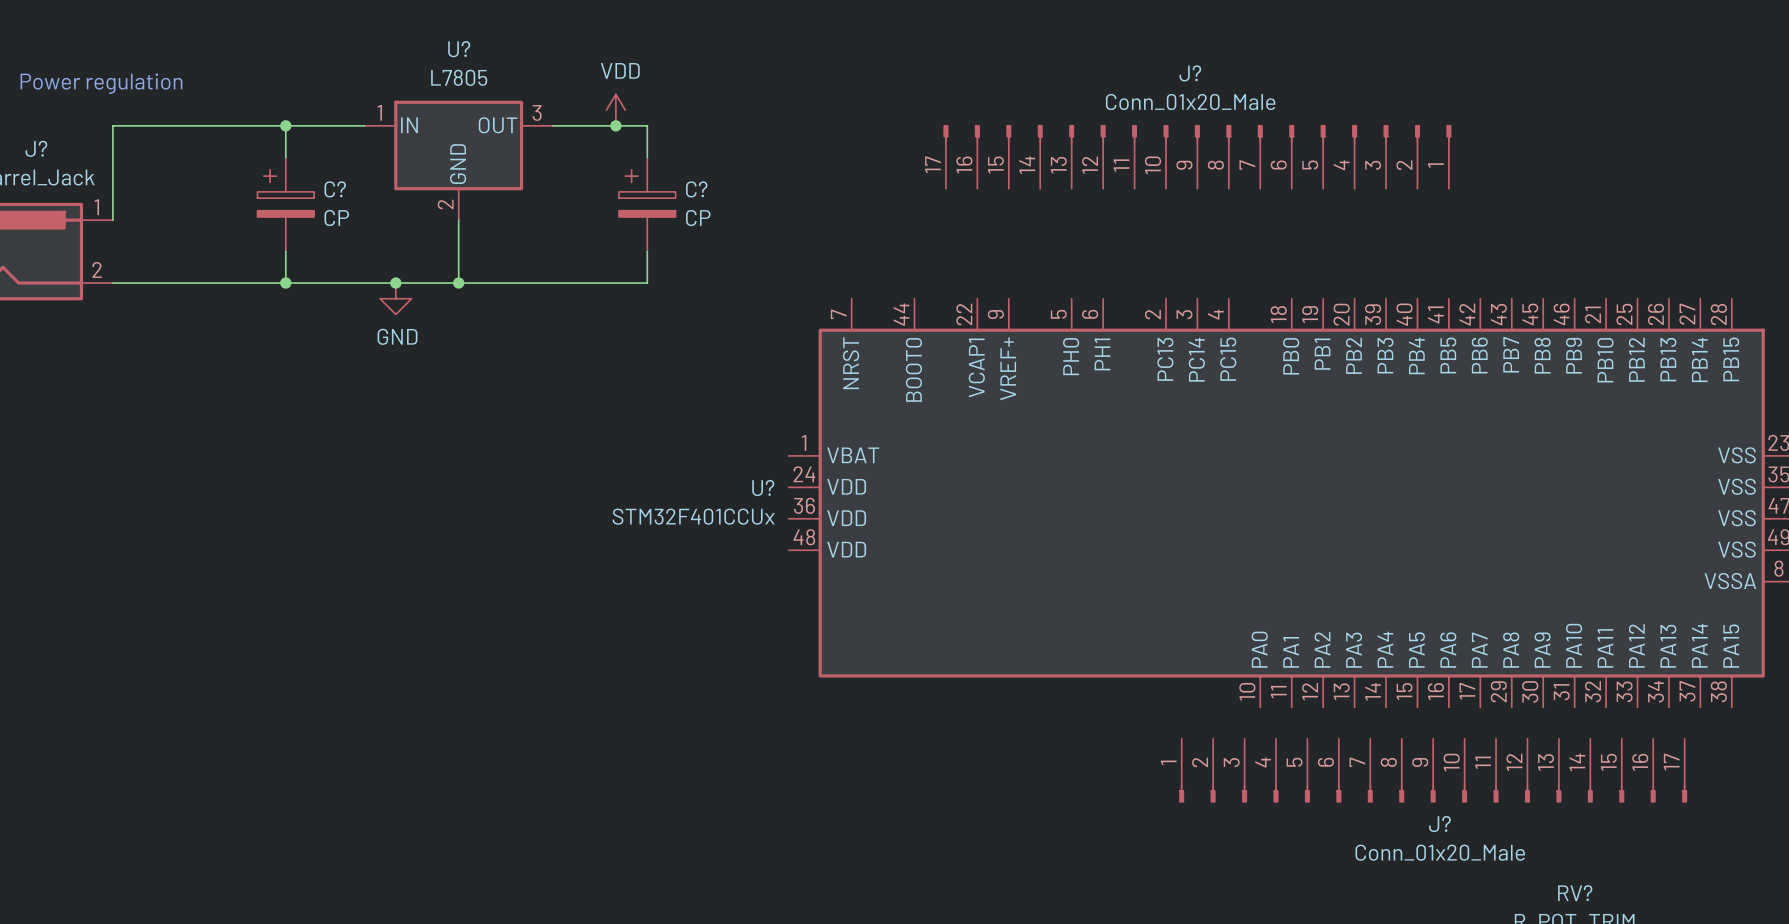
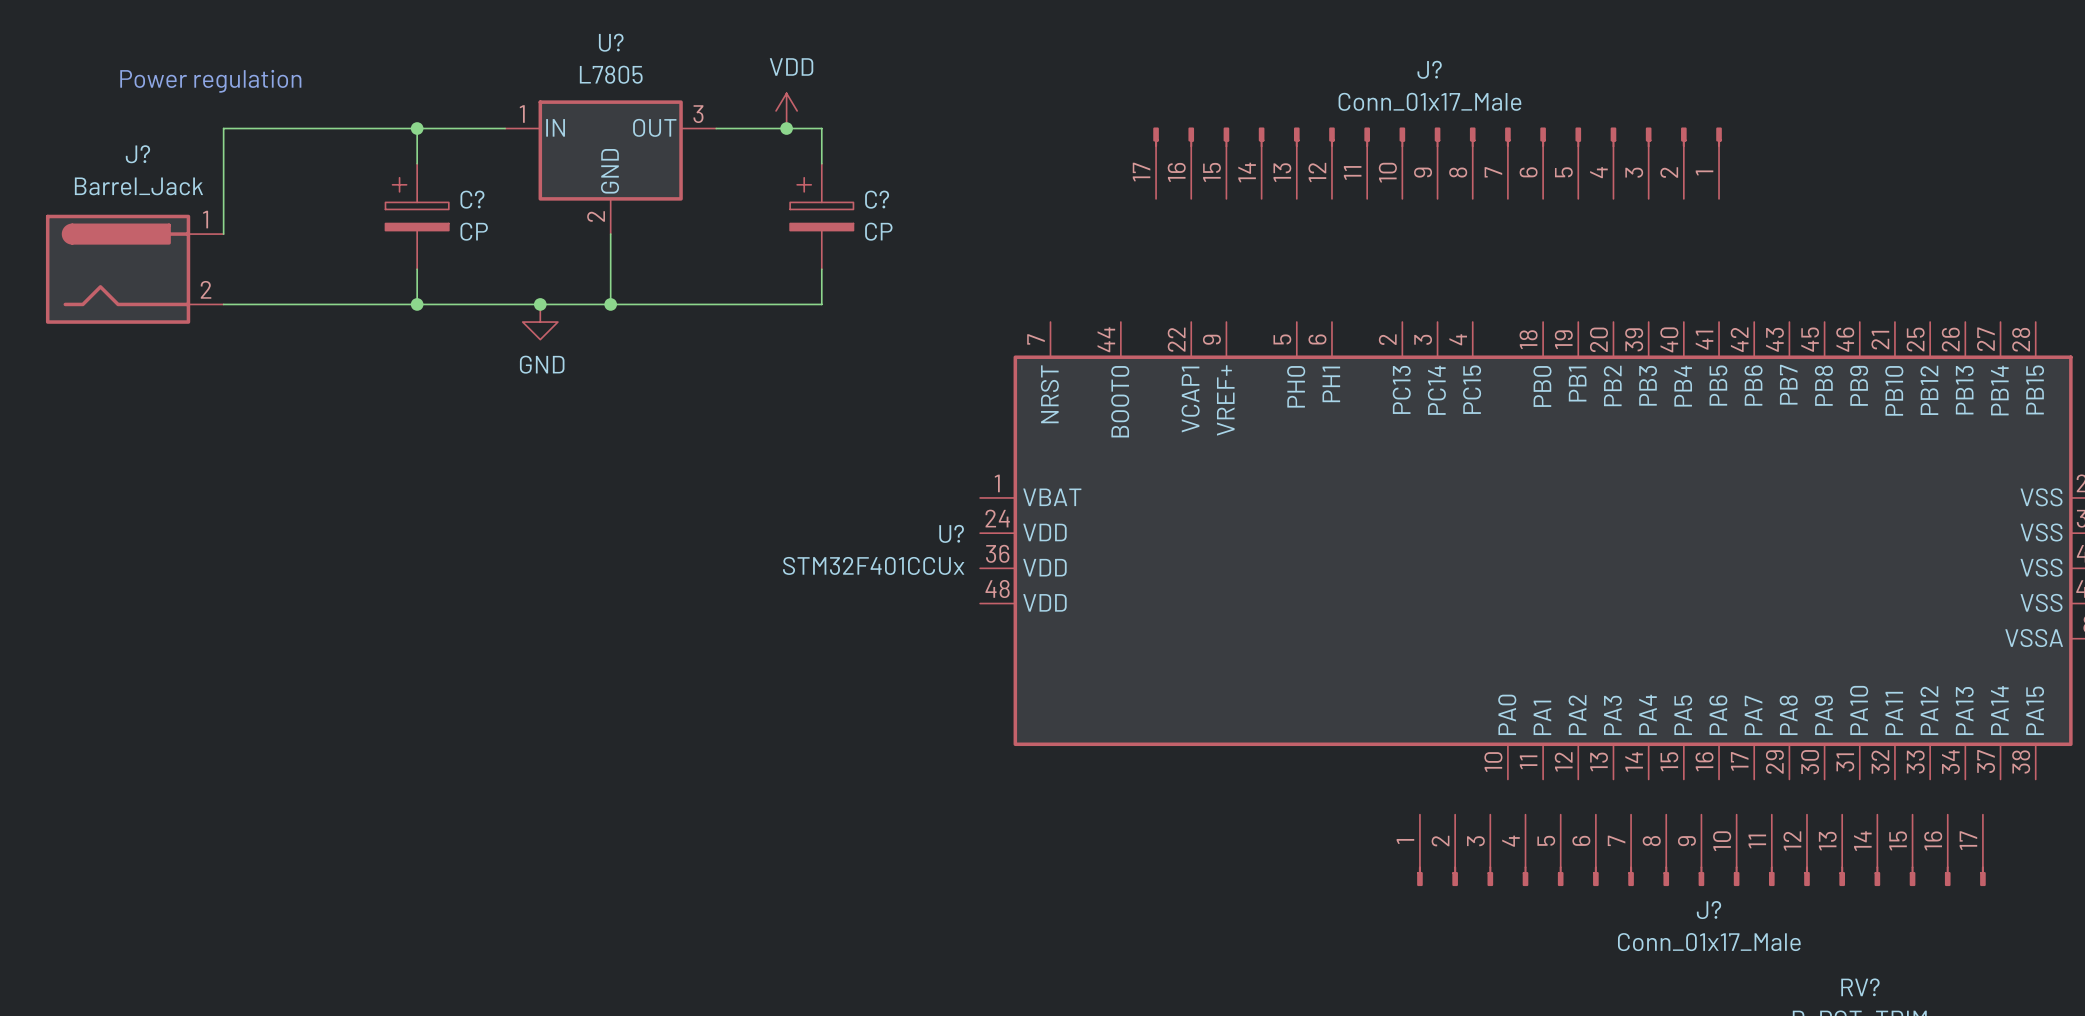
J? value: Conn_01x20_Male (1190, 102) -> Conn_01x17_Male (1429, 101)
J? value: Conn_01x20_Male (1440, 852) -> Conn_01x17_Male (1709, 942)

